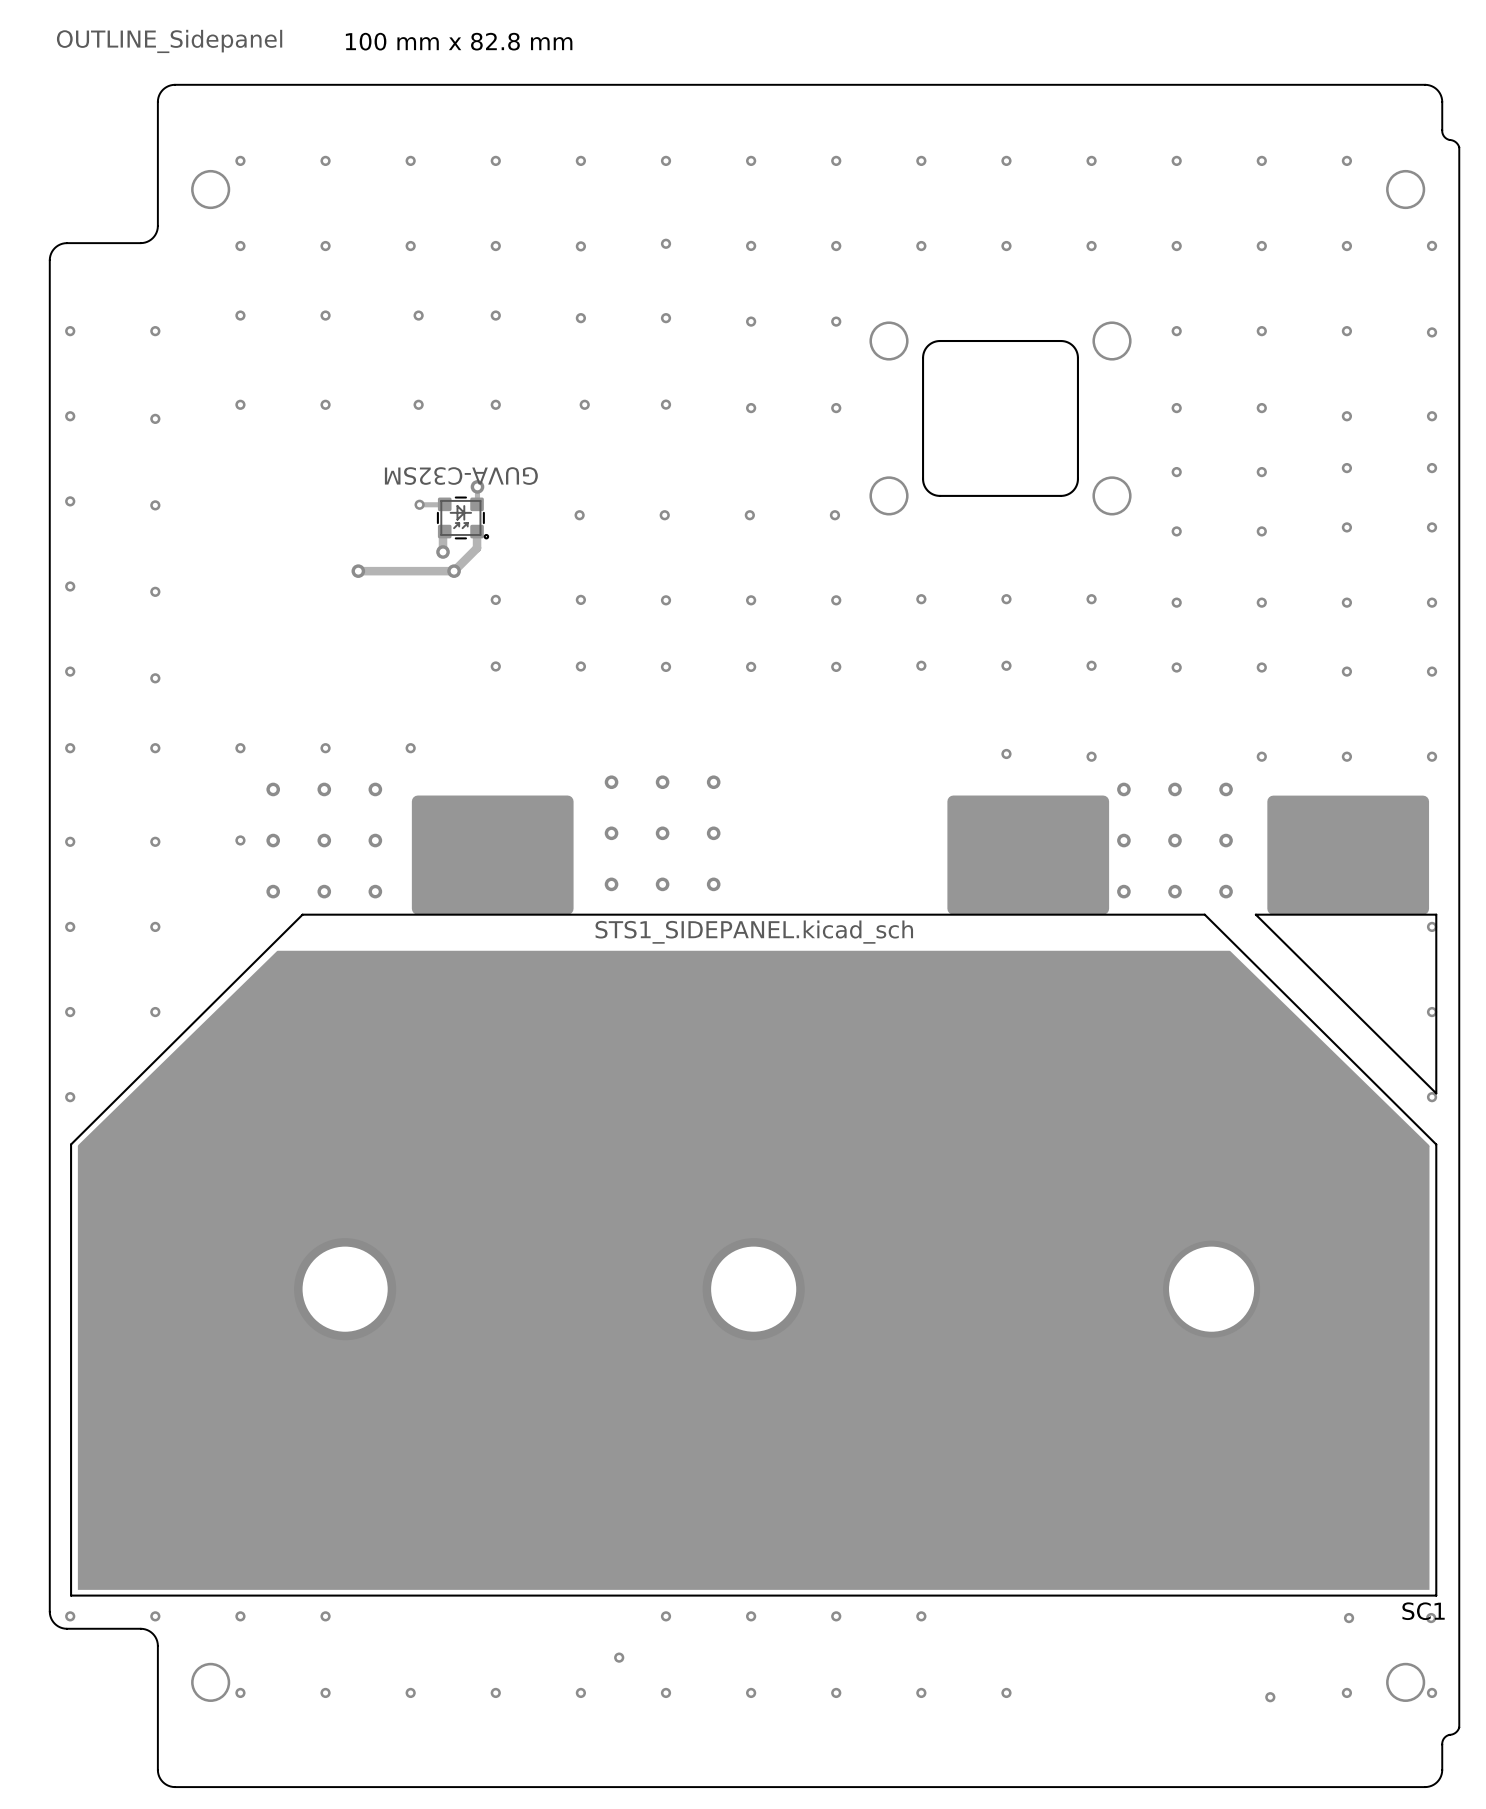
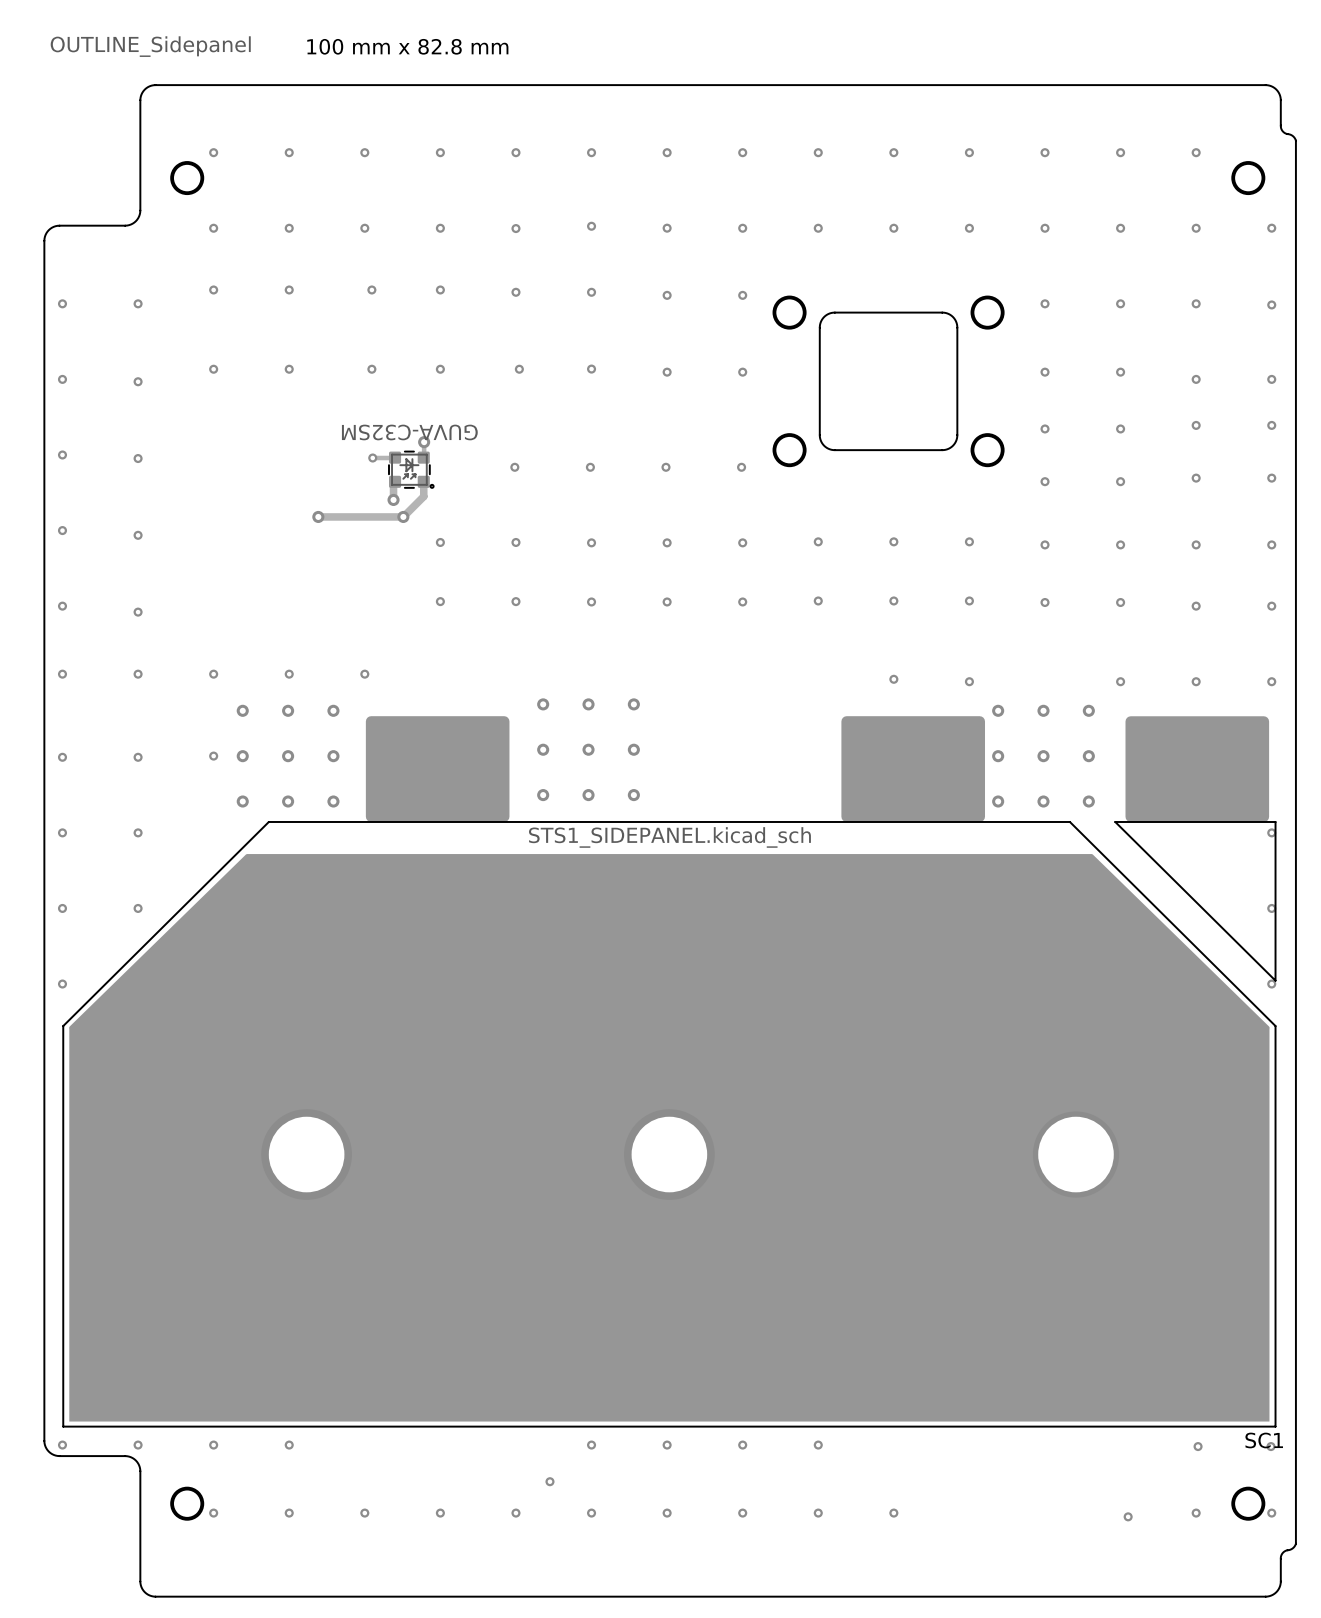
drawing: none -> [43, 84, 1297, 1598]
part: OUTLINE_Sidepanel (754, 935) -> none

